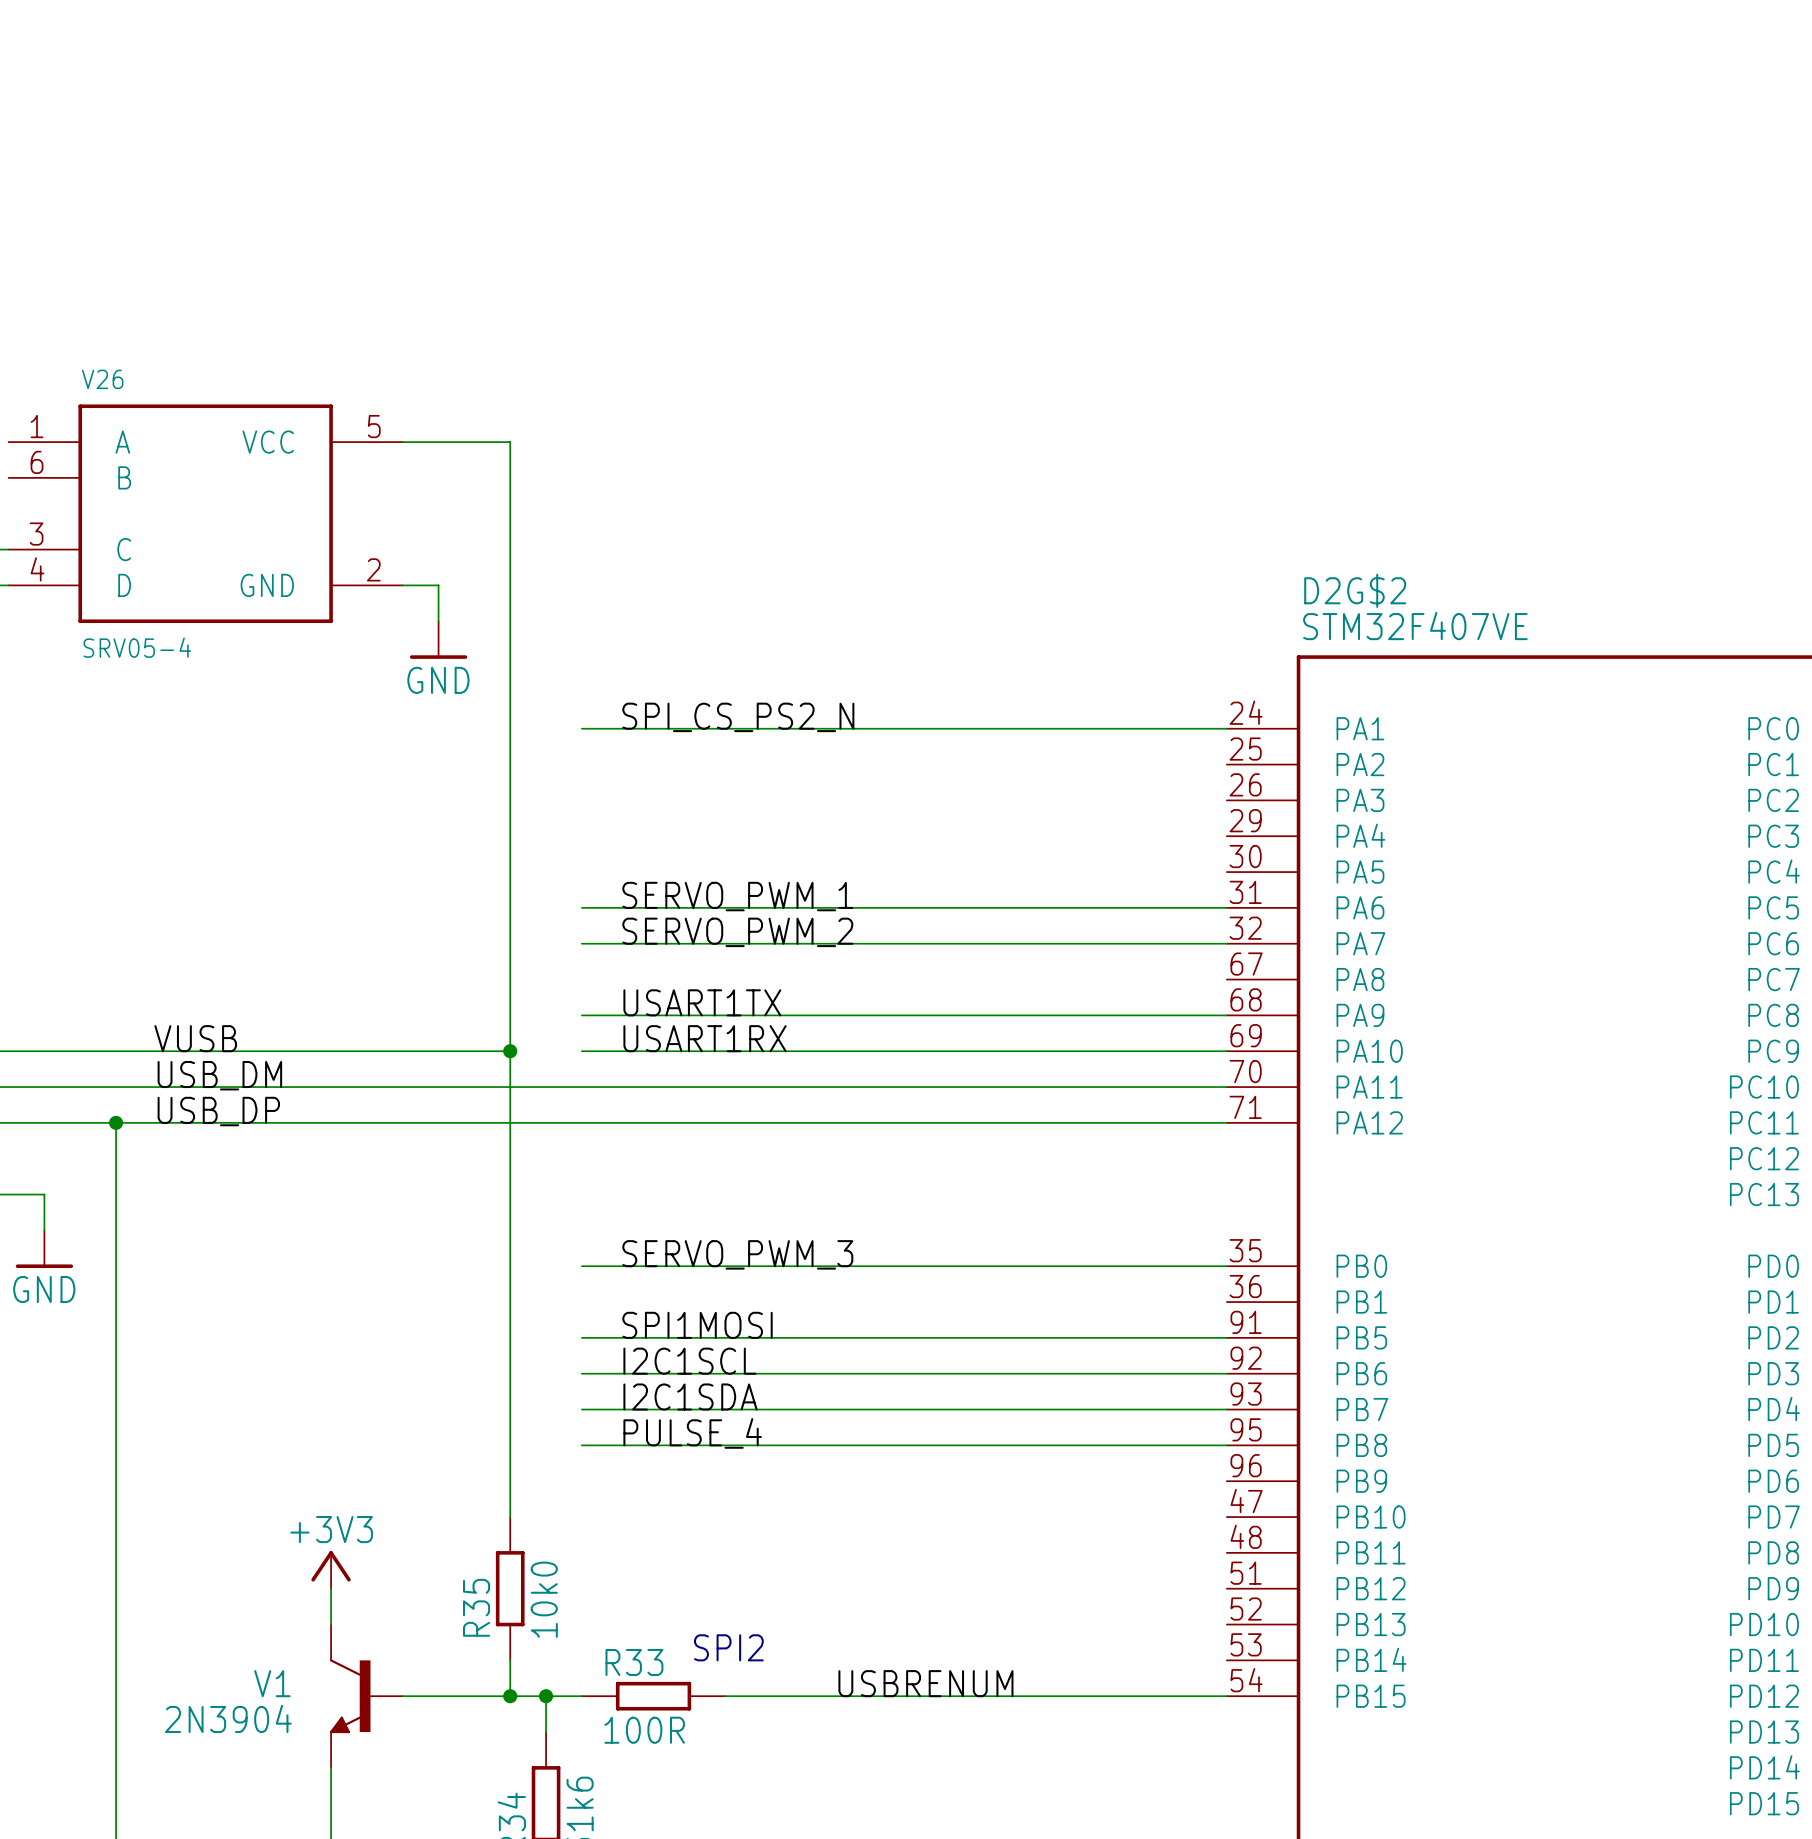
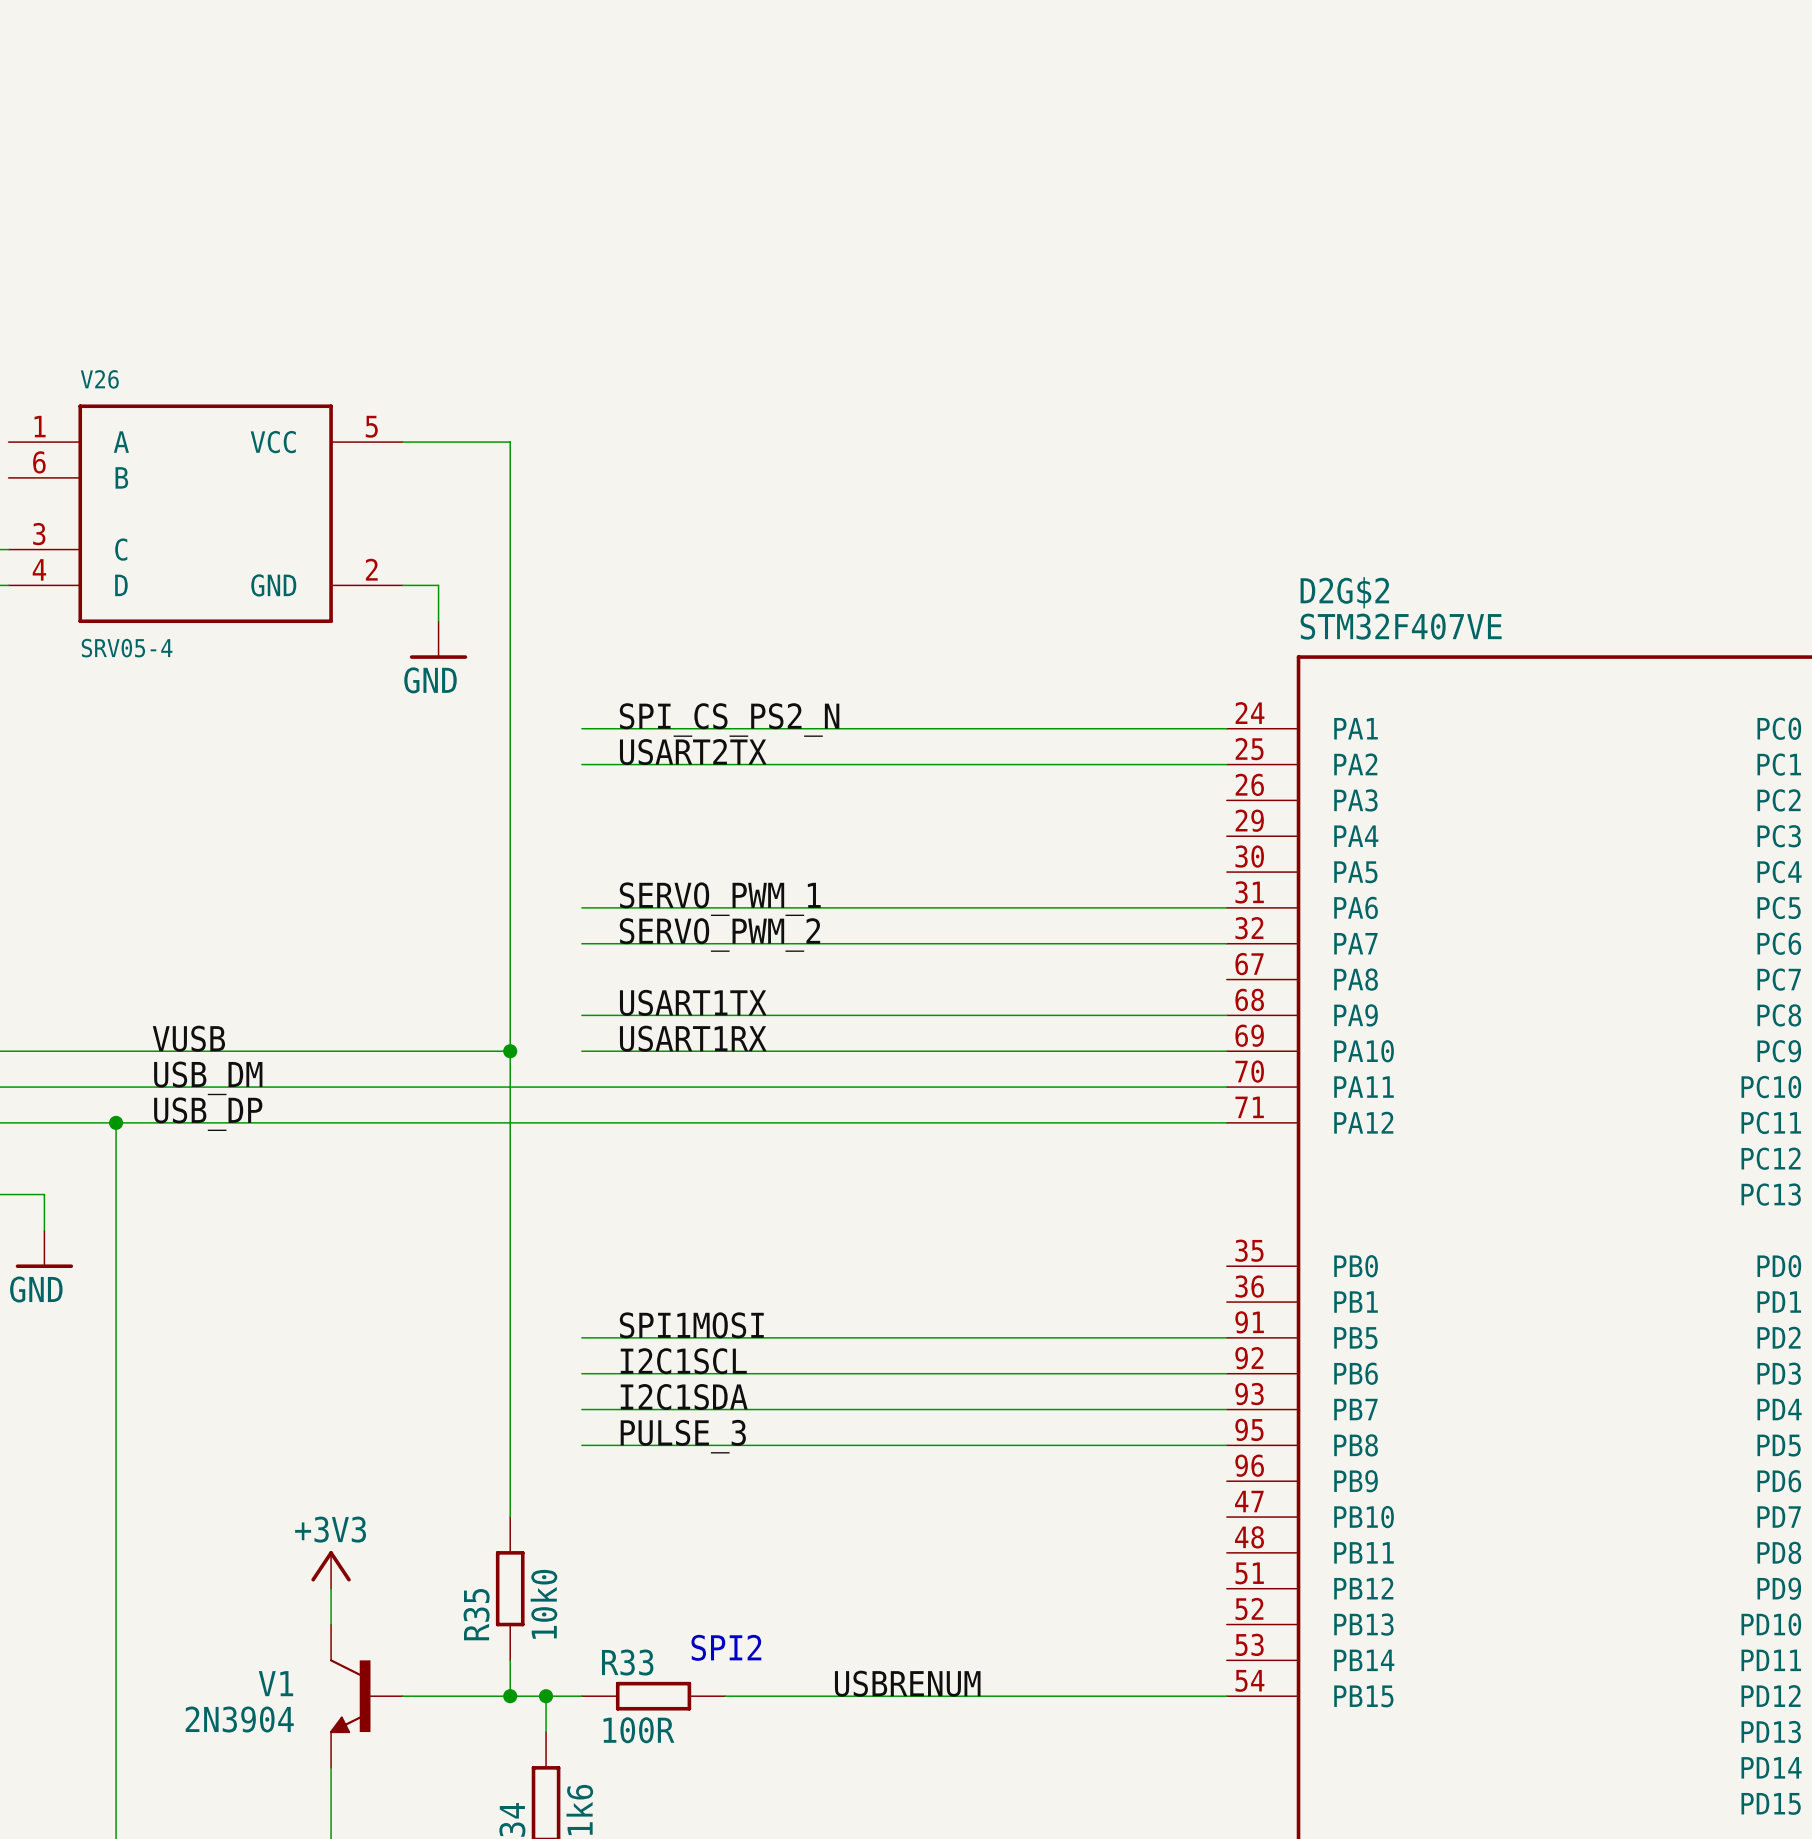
label: none -> USART2TX (693, 752)
wire: none -> (581, 764) (1226, 764)
label: SERVO_PWM_3 (737, 1254) -> none
wire: (581, 1266) (1226, 1266) -> none
label: PULSE_4 (692, 1433) -> PULSE_3 (683, 1436)

